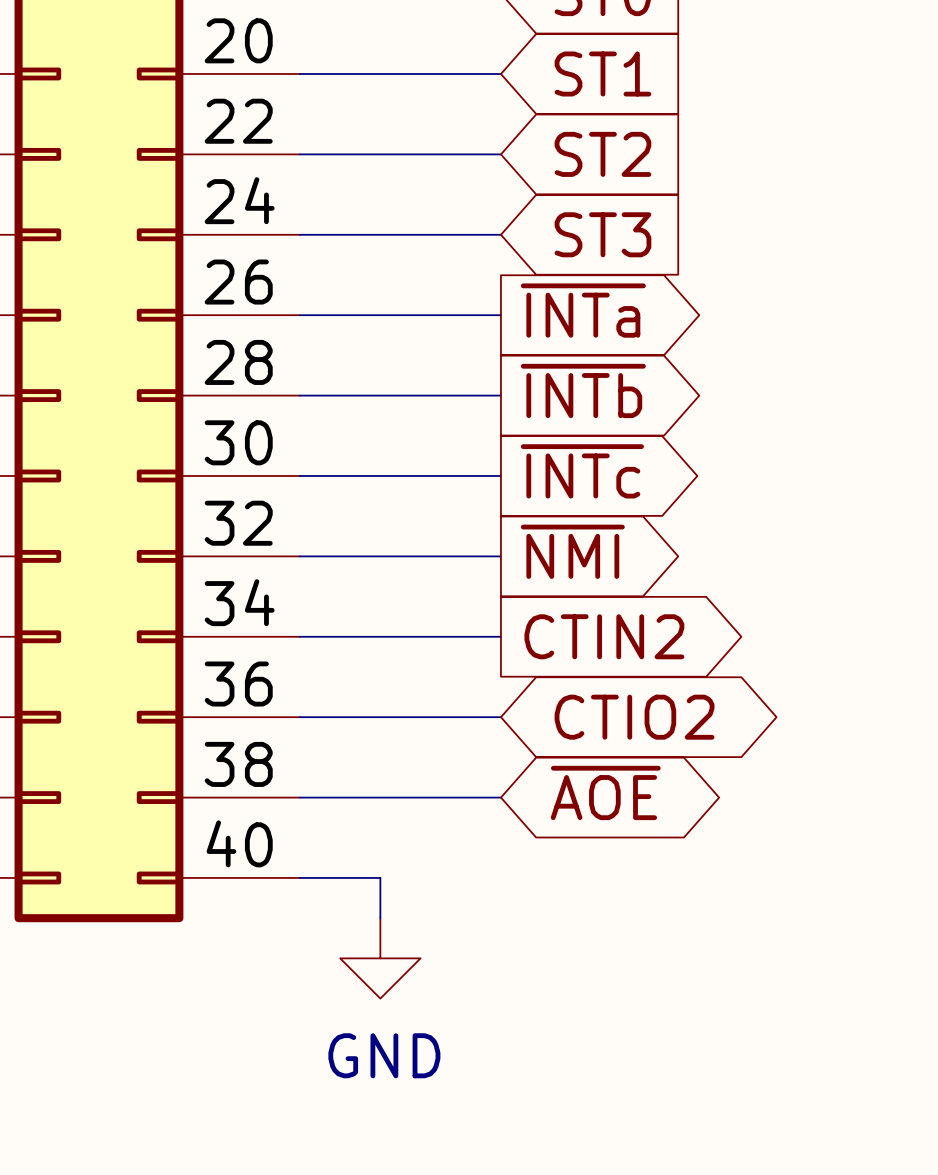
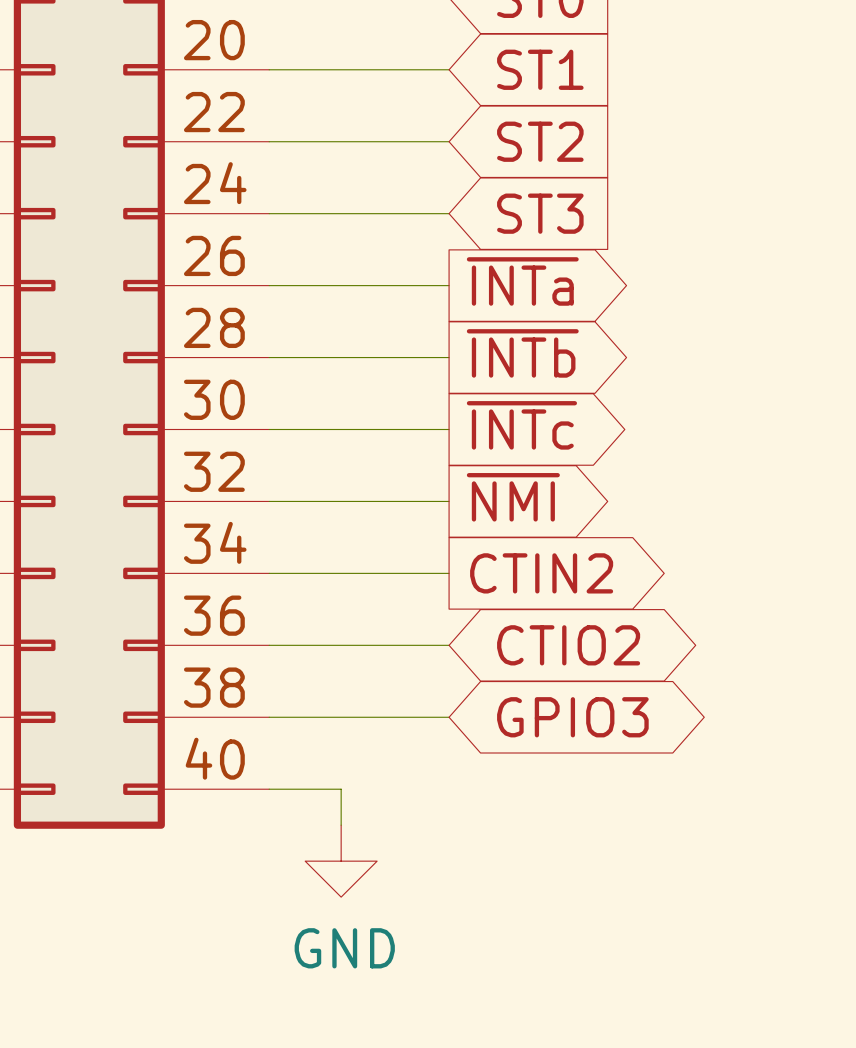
global label: ~{AOE} (605, 792) -> GPIO3 (572, 717)

